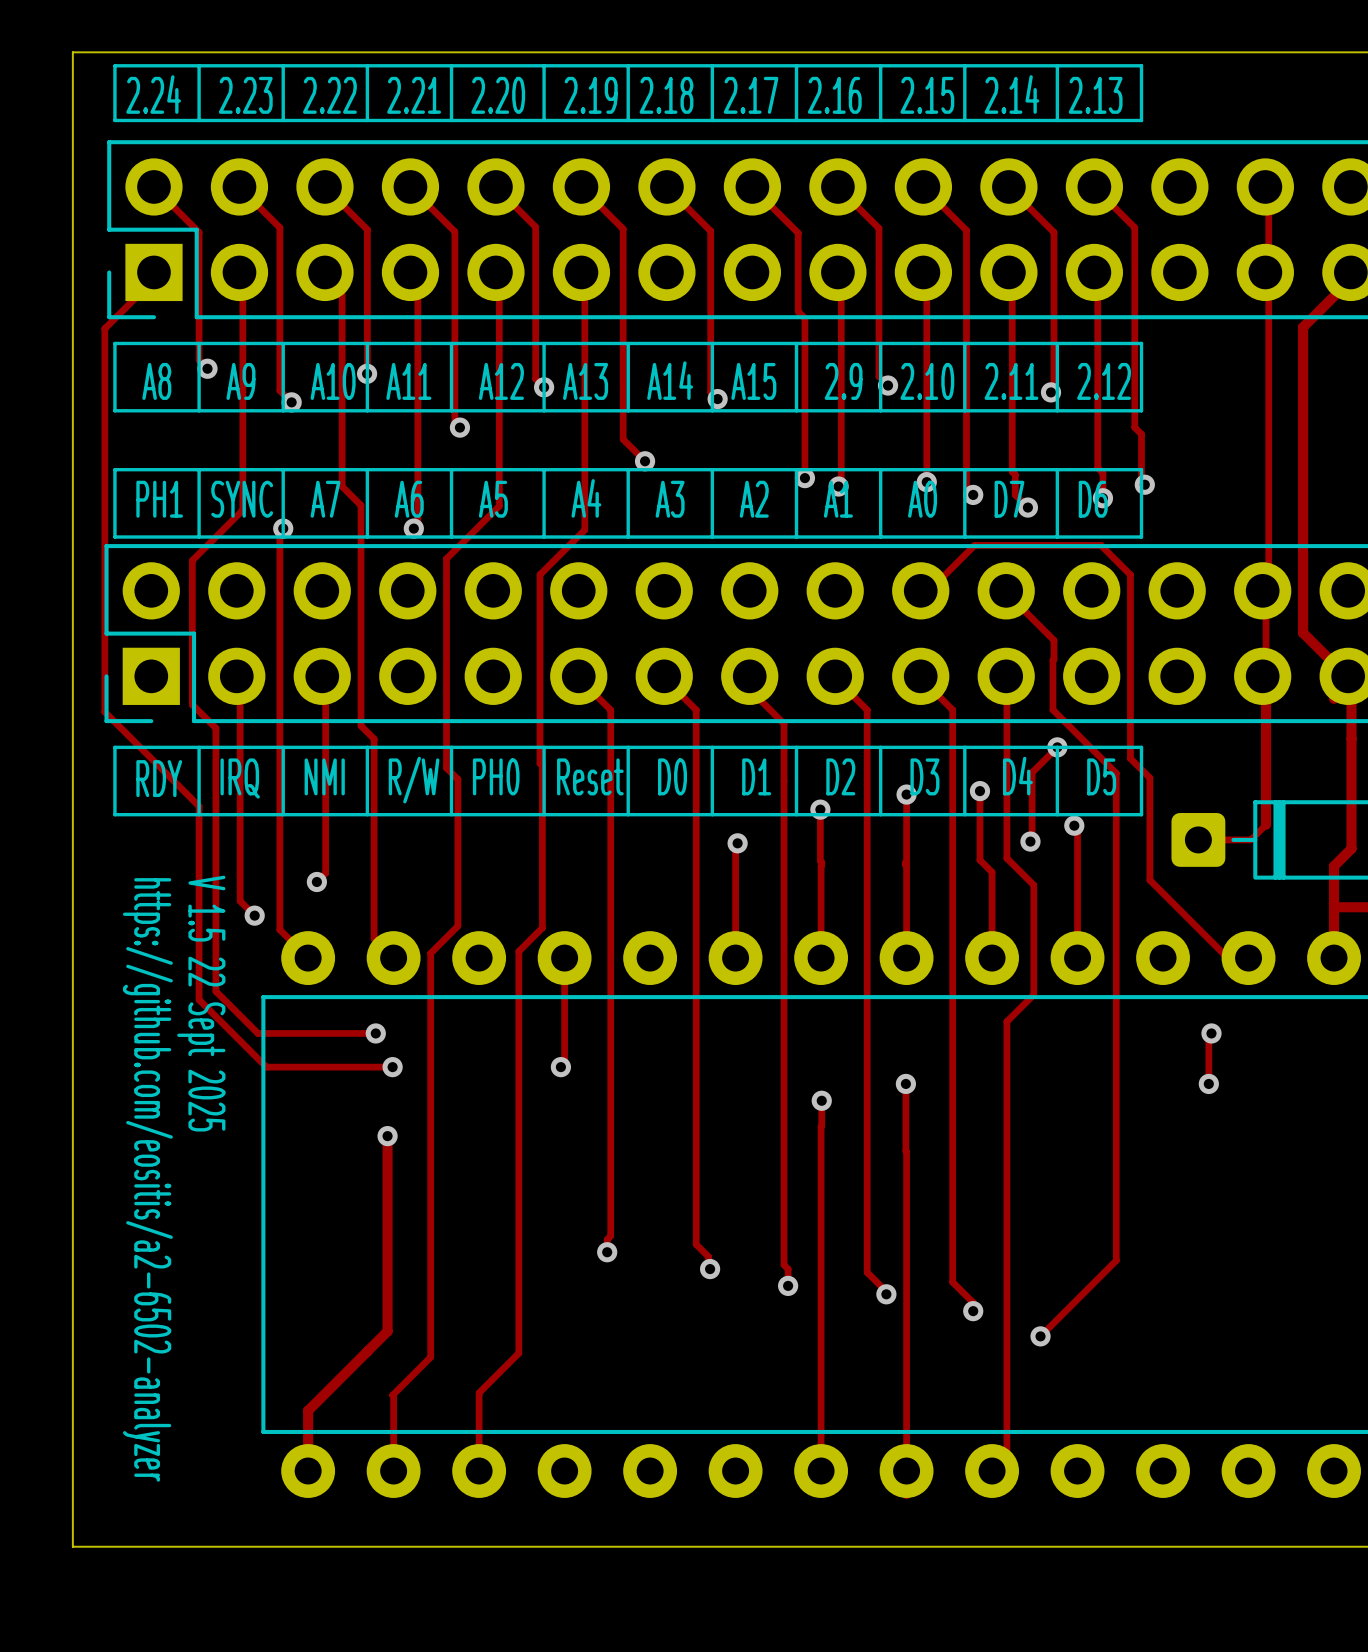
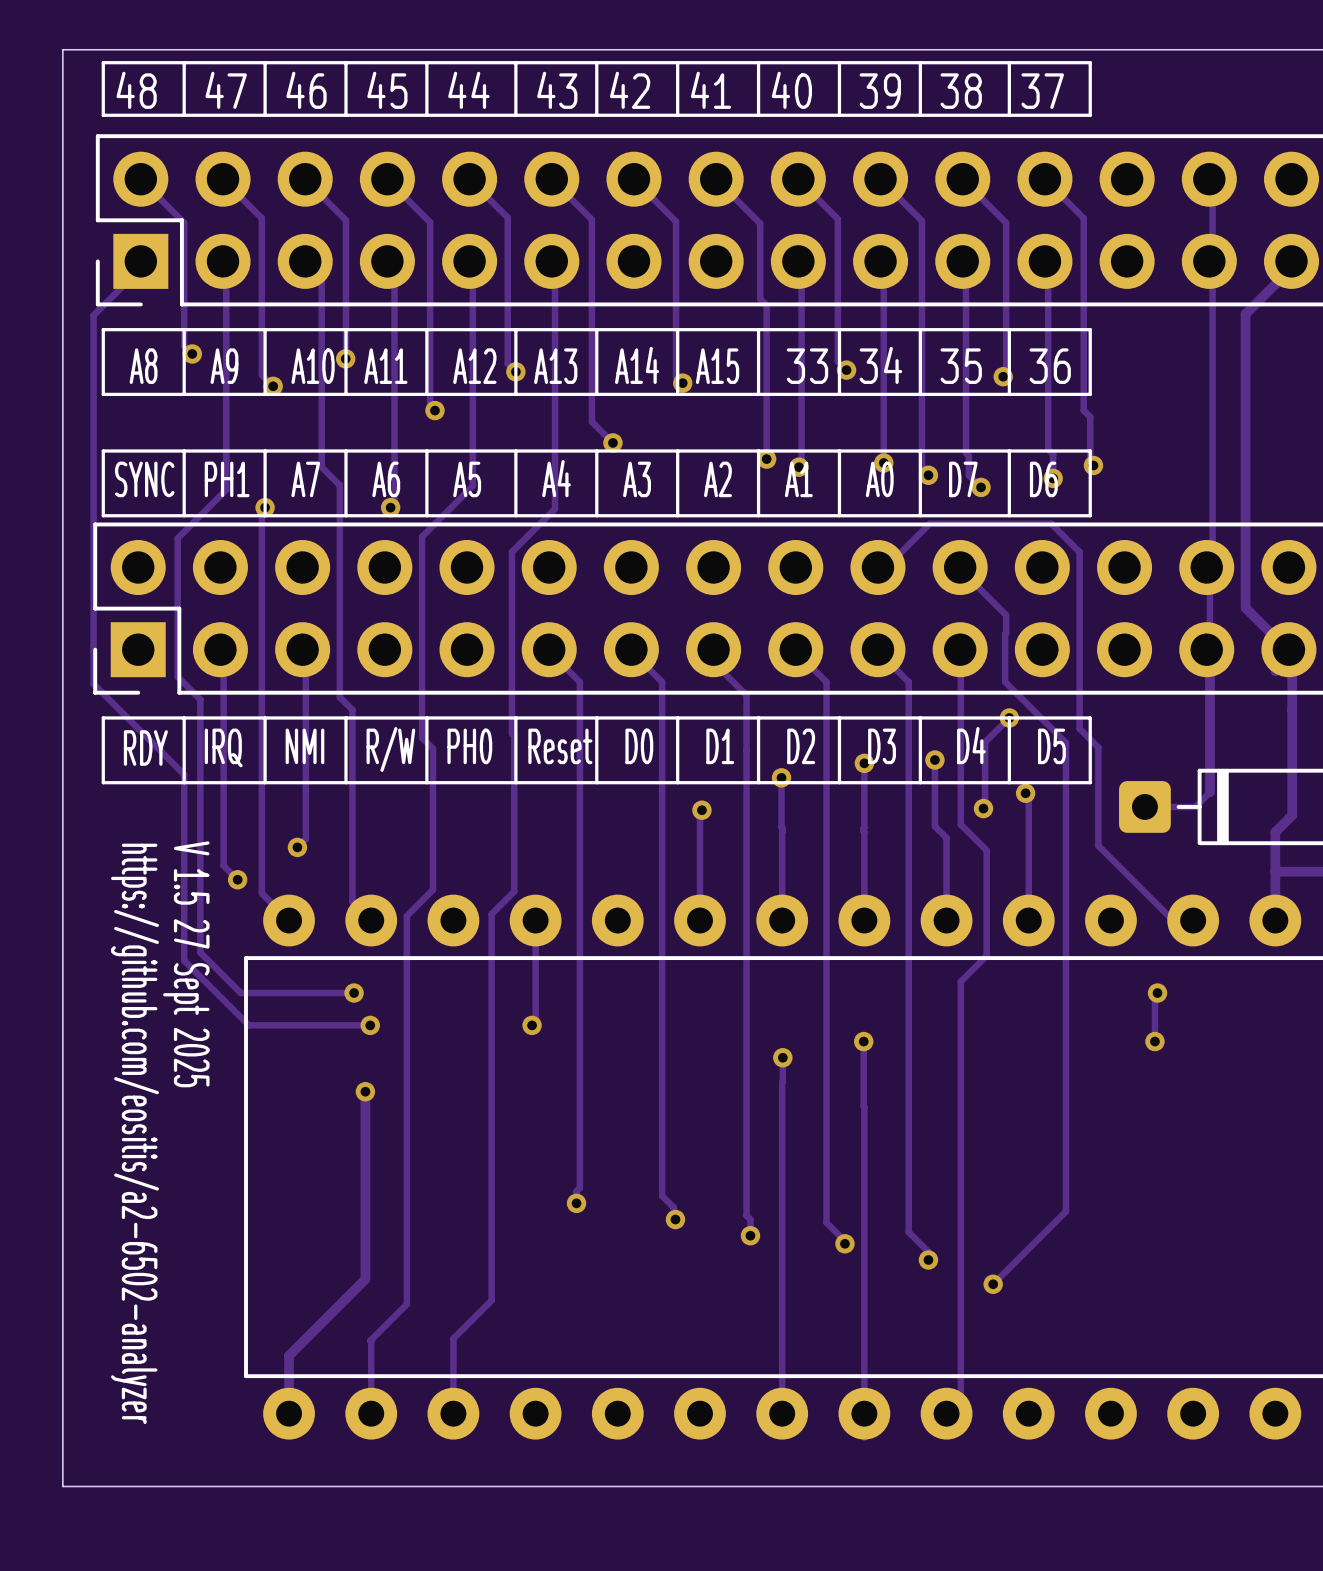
text: 2.24 (153, 94) -> 48 (136, 90)
text: 2.14 (1011, 94) -> 38 (961, 91)
text: 2.23 (245, 95) -> 47 (226, 90)
text: 2.22 (329, 95) -> 46 (306, 90)
text: 2.21 (414, 95) -> 45 (387, 90)
text: 2.20 (498, 95) -> 44 (468, 90)
text: 2.19 (590, 95) -> 43 (557, 90)
text: 2.18 (666, 95) -> 42 (630, 90)
text: 2.17 (751, 95) -> 41 (711, 90)
text: 2.16 (834, 95) -> 40 (791, 90)
text: 2.15 (927, 95) -> 39 (880, 91)
text: 2.13 (1095, 95) -> 37 (1042, 91)
text: 2.9 (843, 381) -> 33 (807, 366)
text: 2.10 (927, 381) -> 34 (880, 365)
text: 2.11 (1011, 381) -> 35 (961, 366)
text: 2.12 (1104, 381) -> 36 (1050, 366)
text position: PH1 (159, 499) -> PH1 (227, 479)
text position: SYNC (242, 499) -> SYNC (144, 479)
text: V 1.5 22 Sept 2025 (201, 1003) -> V 1.5 27 Sept 2025 (186, 964)

